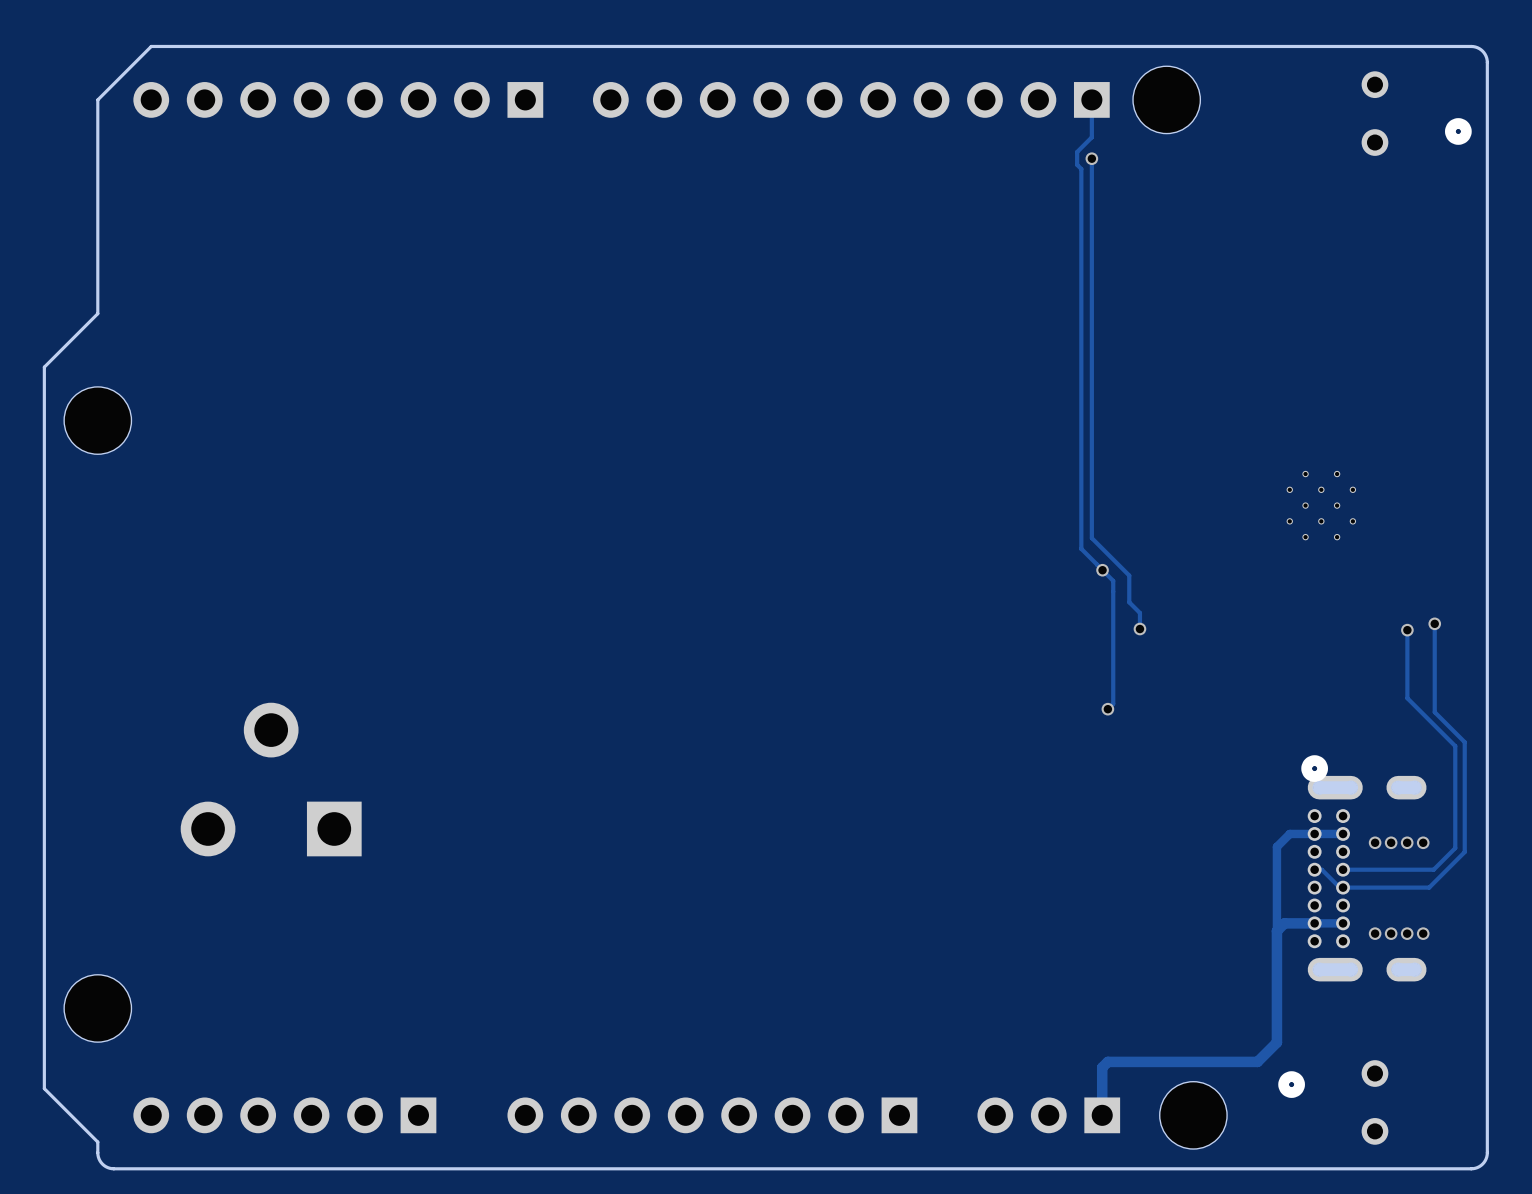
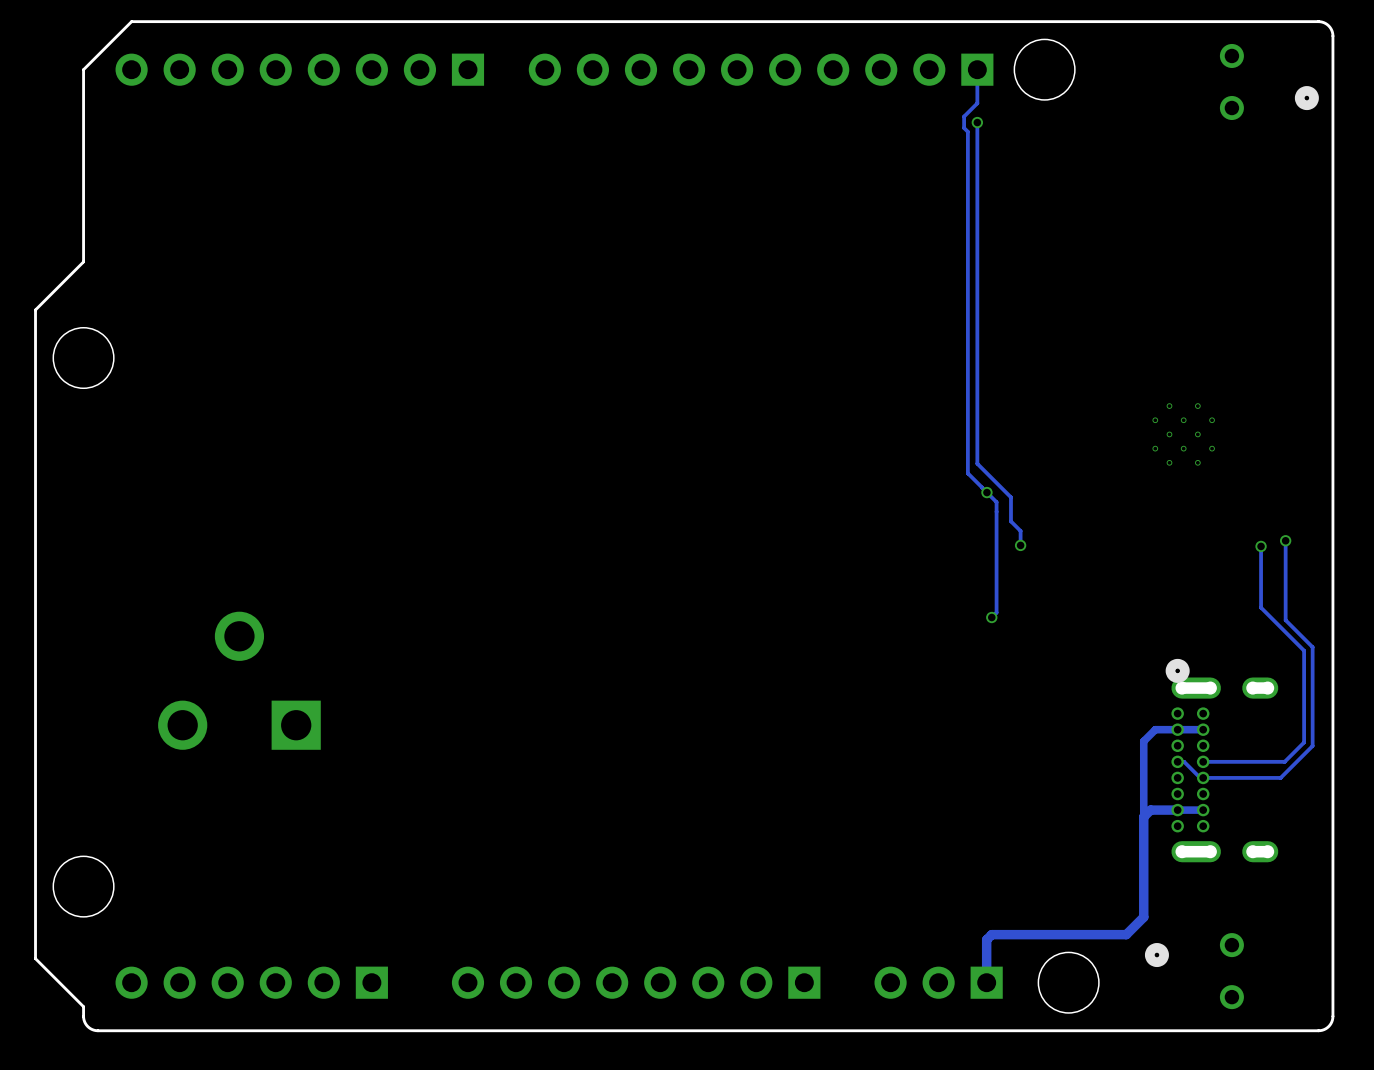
via: (1375, 842) -> none
via: (1391, 842) -> none
via: (1407, 842) -> none
via: (1423, 842) -> none
via: (1375, 933) -> none
via: (1391, 933) -> none
via: (1407, 933) -> none
via: (1423, 933) -> none

